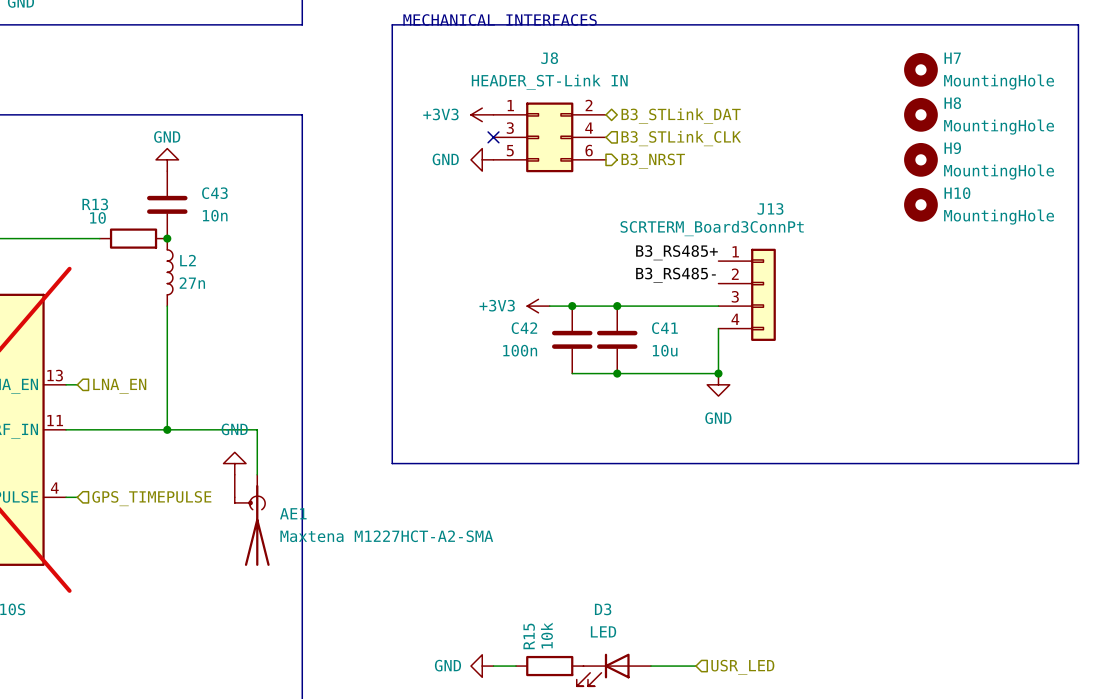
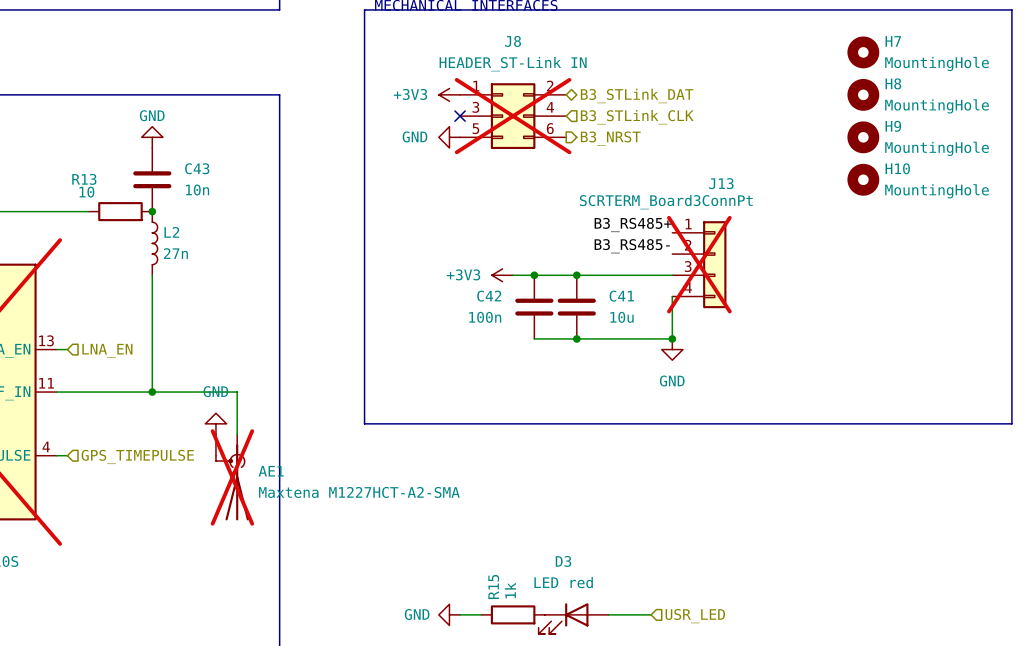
J8 do-not-place cross: none -> (513, 116)
J13 do-not-place cross: none -> (699, 264)
AE1 do-not-place cross: none -> (232, 477)
D3 value: LED (603, 631) -> LED red (563, 582)
R15 value: 10k (546, 635) -> 1k (510, 590)

